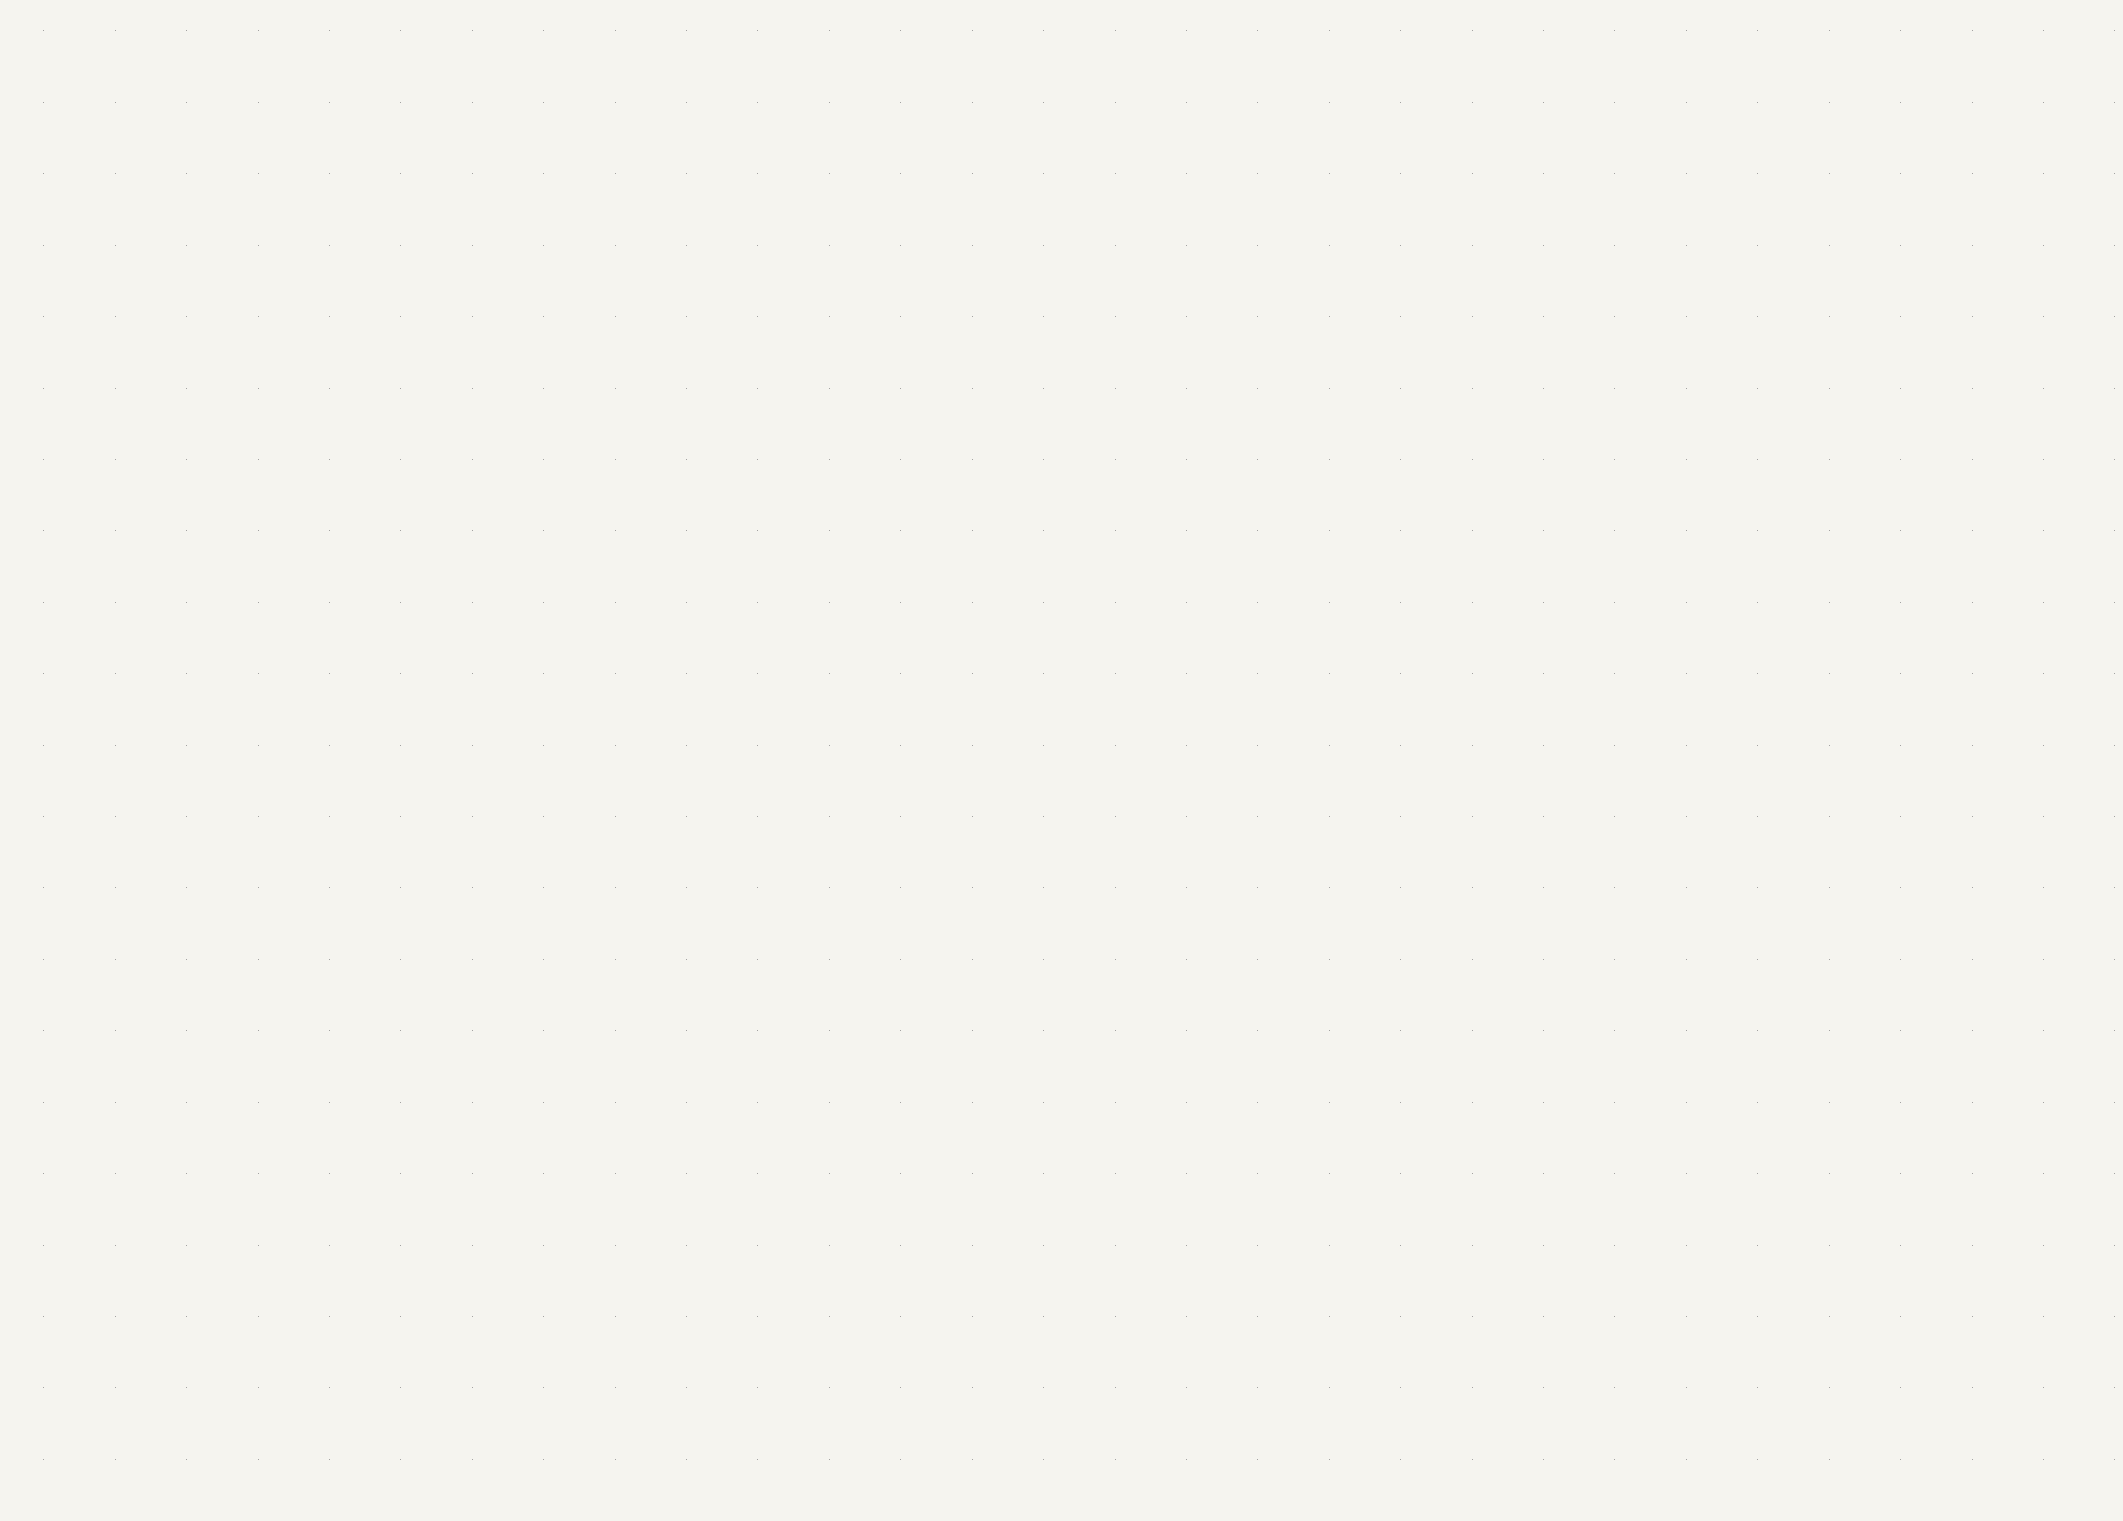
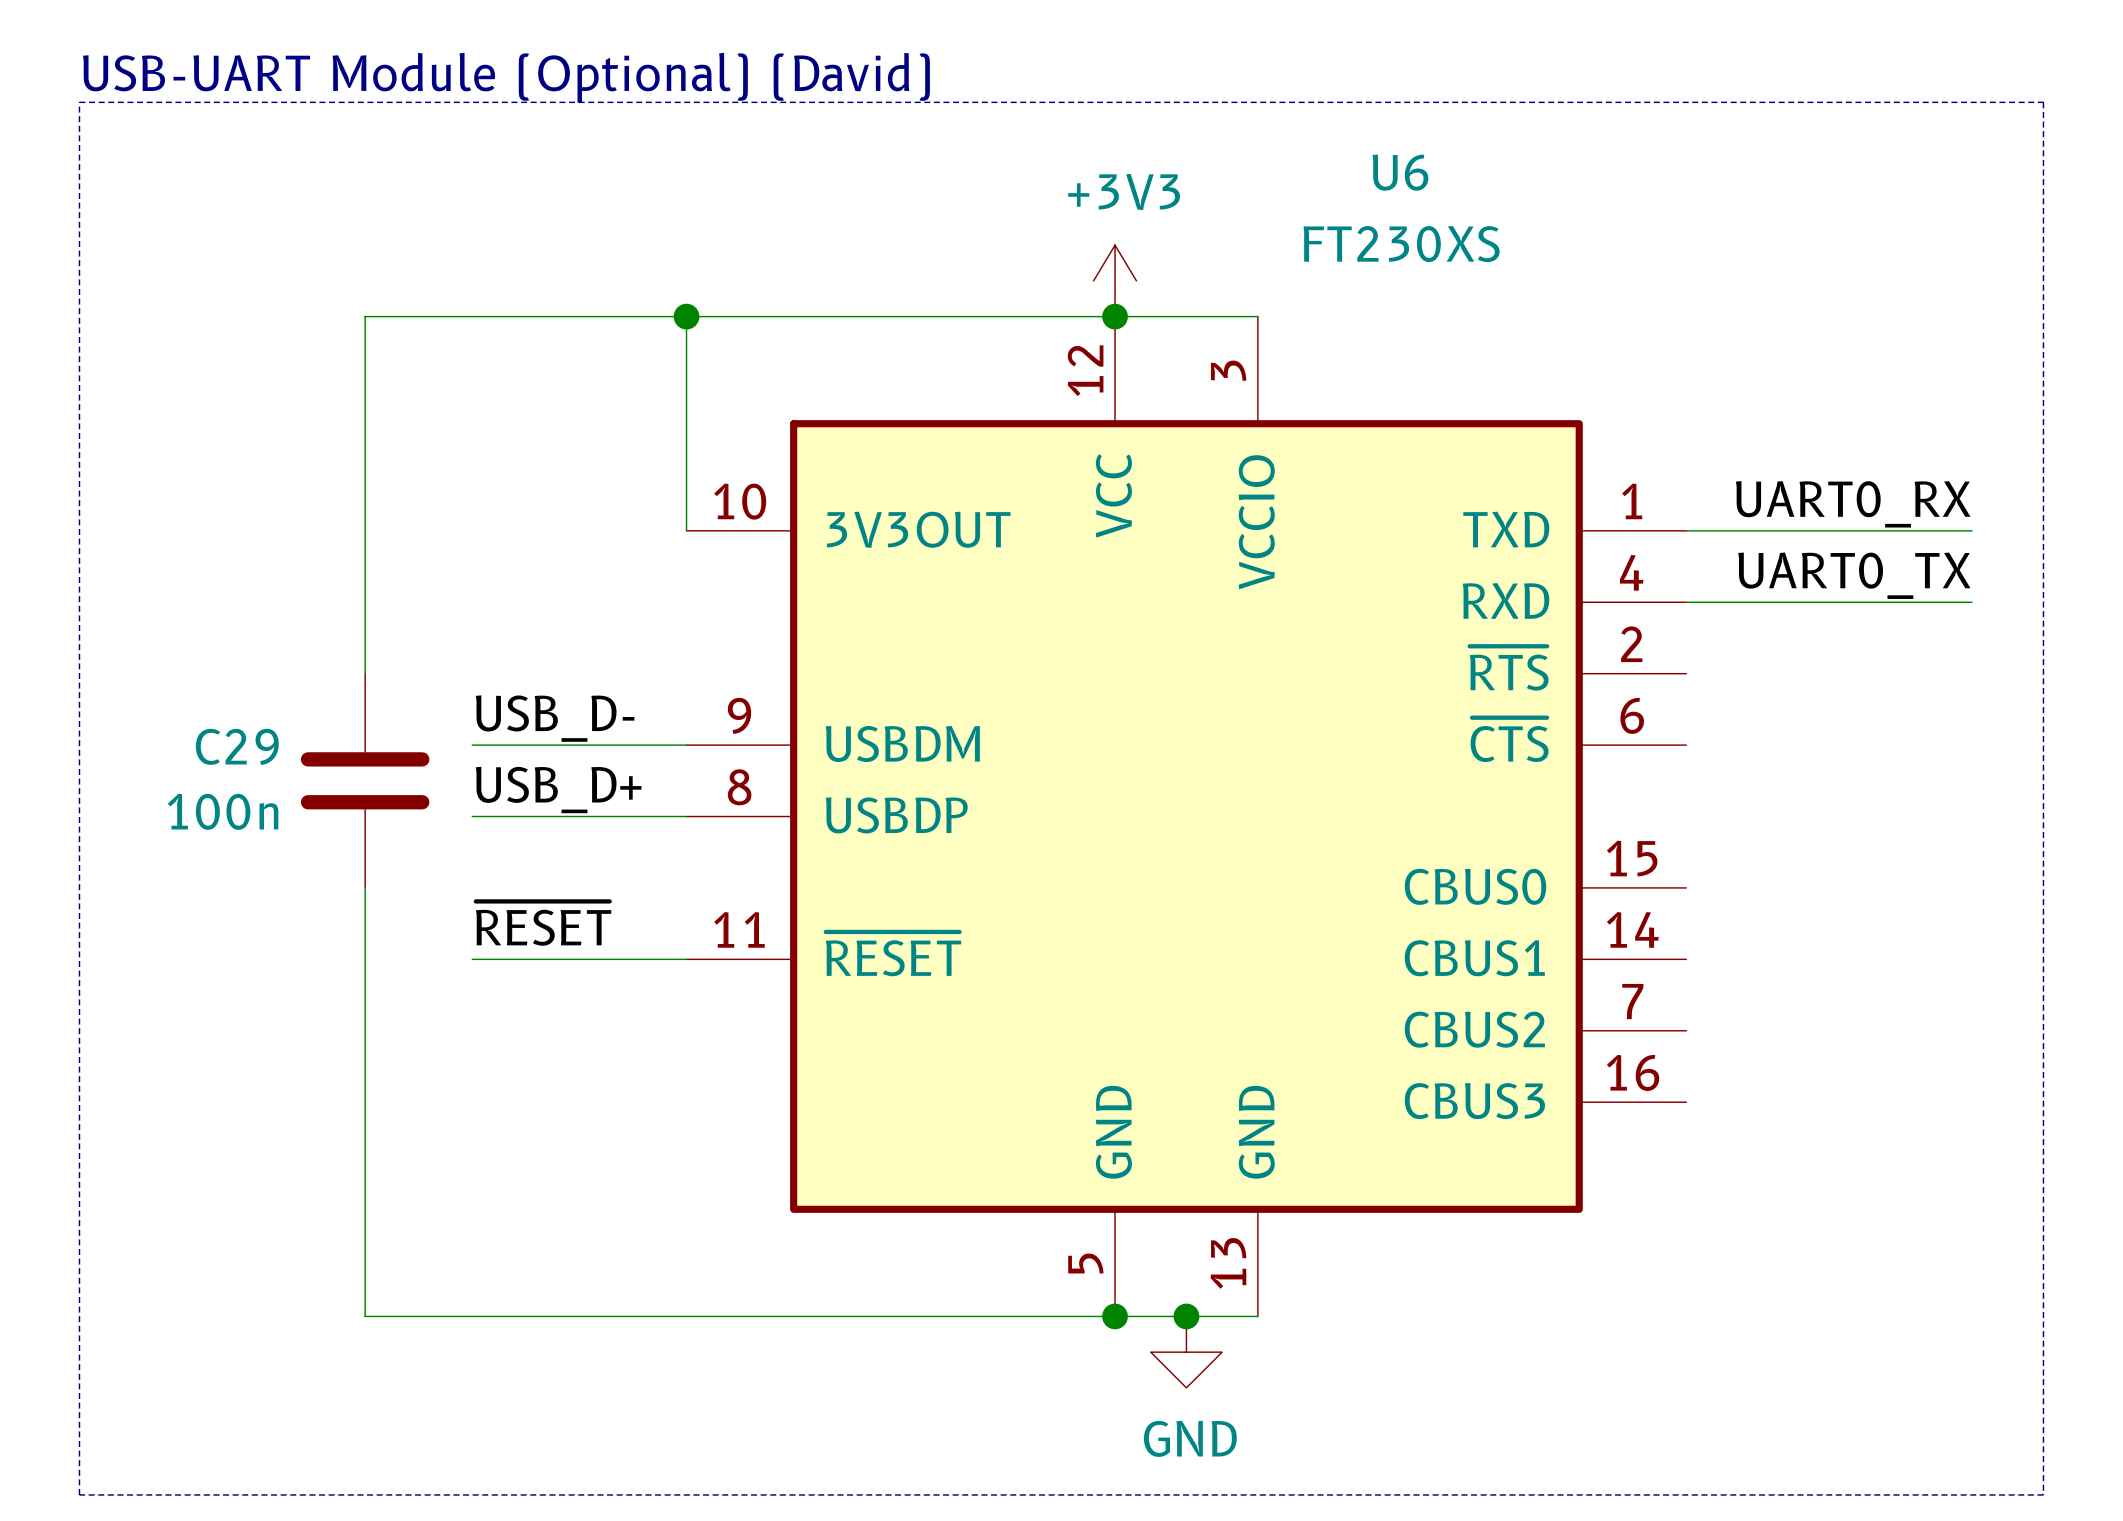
text: none -> USB-UART Module (Optional) (David) (506, 77)
line: none -> (79, 102) (2043, 102) (2043, 1494) (79, 1494) (79, 102)
power symbol: none -> +3V3 (1115, 280)
wire: none -> (686, 316) (686, 530)
junction: none -> (686, 316)
junction: none -> (1115, 316)
wire: none -> (1257, 316) (365, 316) (365, 673)
label: none -> UART0_RX (1853, 504)
wire: none -> (1686, 530) (1972, 530)
label: none -> UART0_TX (1854, 575)
wire: none -> (1686, 602) (1972, 602)
label: none -> USB_D- (555, 718)
wire: none -> (472, 745) (686, 745)
C29: none -> 100n (365, 780)
label: none -> USB_D+ (558, 790)
wire: none -> (472, 816) (686, 816)
U6: none -> FT230XS (1186, 816)
wire: none -> (365, 887) (365, 1316) (1257, 1316)
label: none -> ~{RESET} (543, 923)
wire: none -> (472, 959) (686, 959)
junction: none -> (1115, 1316)
junction: none -> (1186, 1316)
power symbol: none -> GND (1186, 1352)

